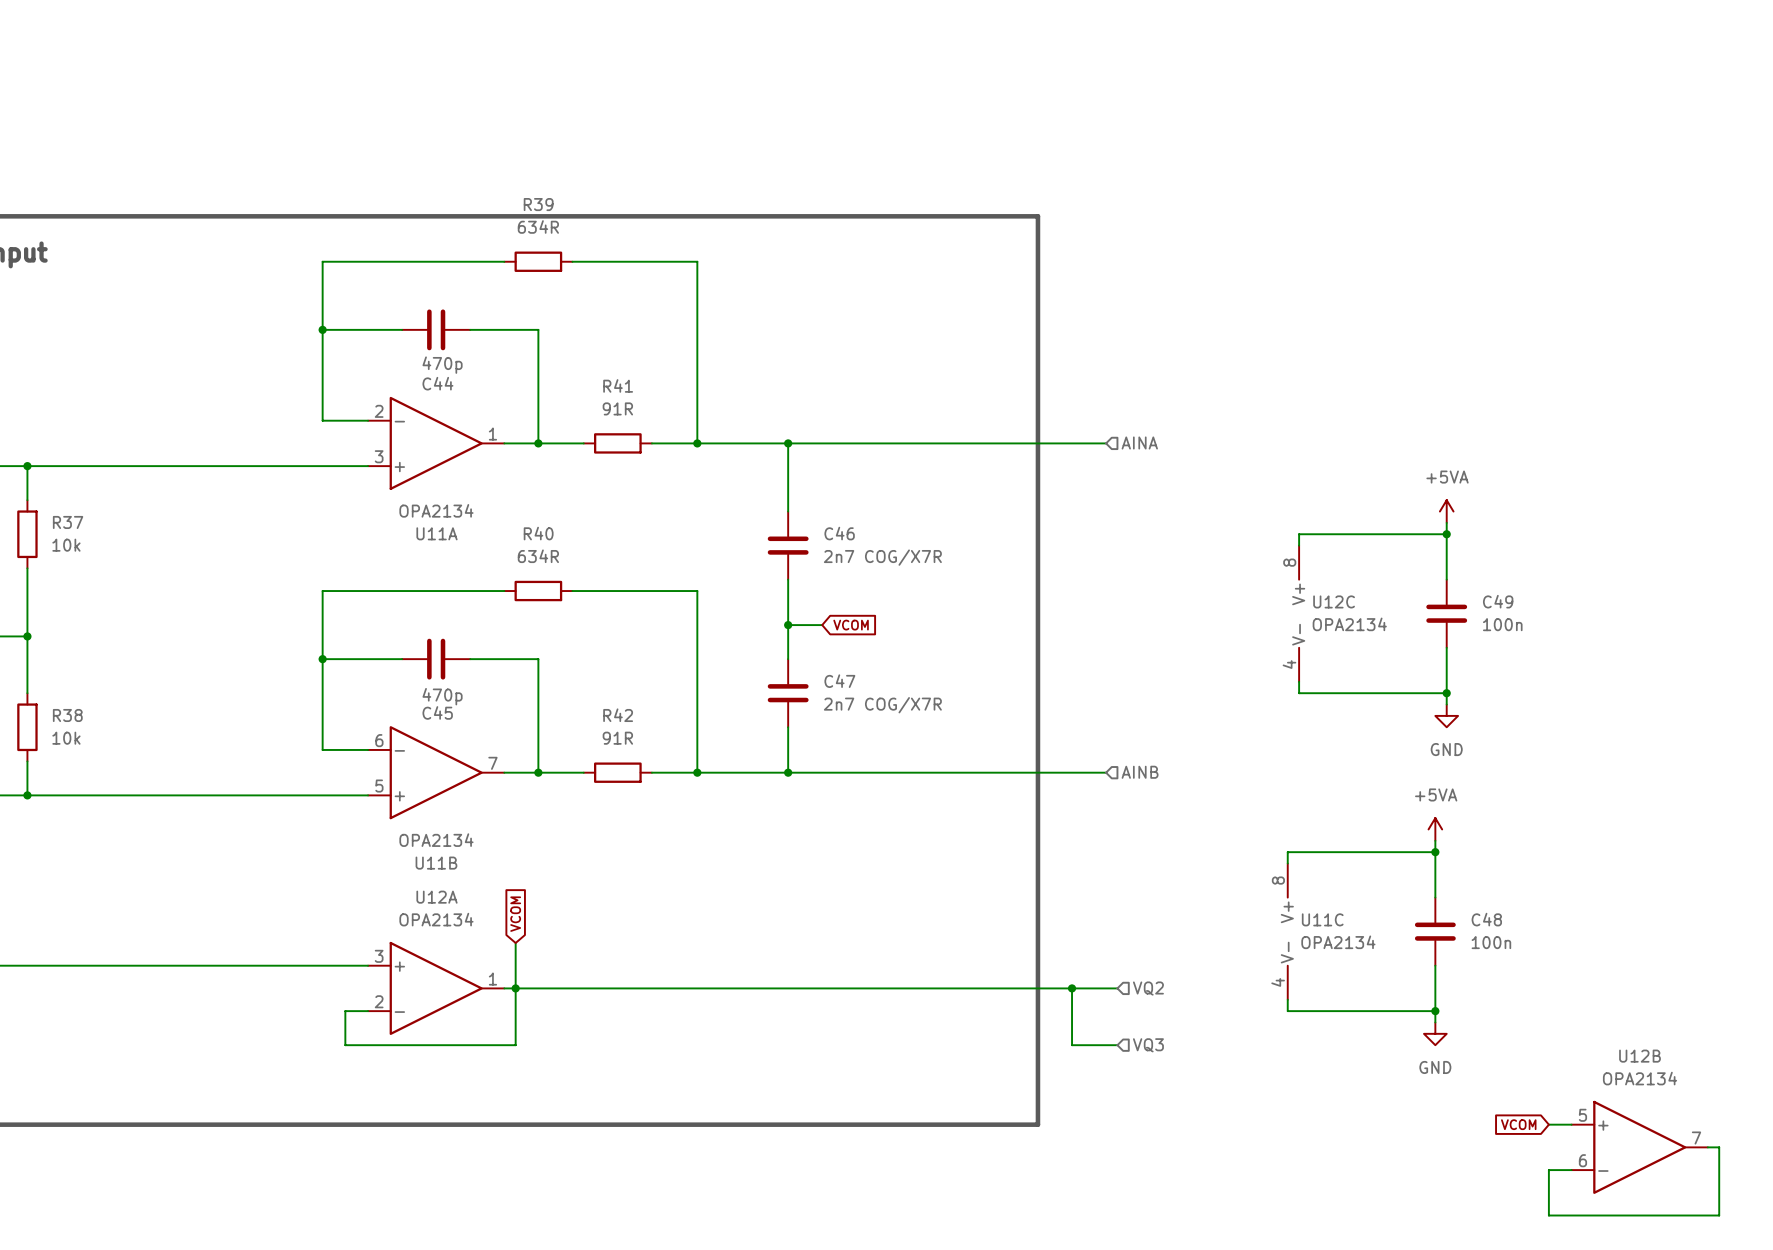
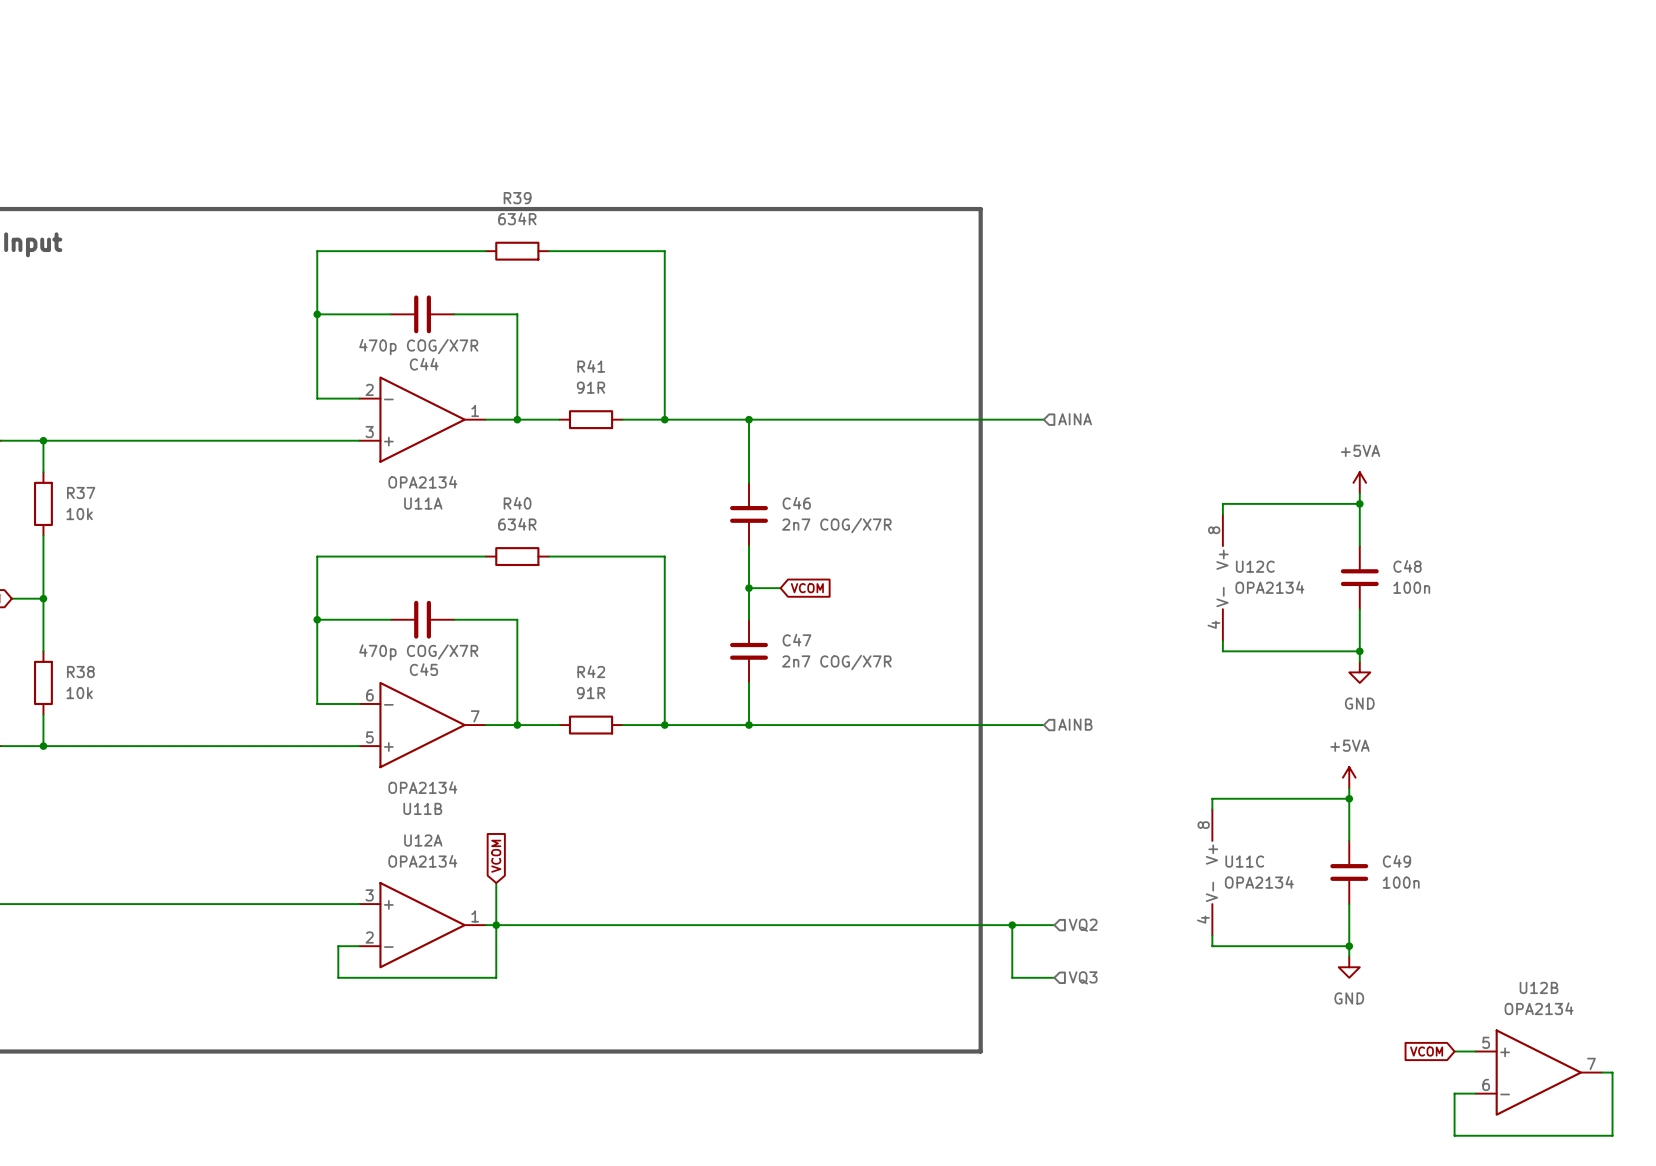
C44 value: 470p (442, 365) -> 470p COG/X7R (418, 347)
C49 name: C49 (1498, 601) -> C48 (1407, 566)
C45 value: 470p (442, 696) -> 470p COG/X7R (418, 652)
C48 name: C48 (1486, 919) -> C49 (1396, 861)

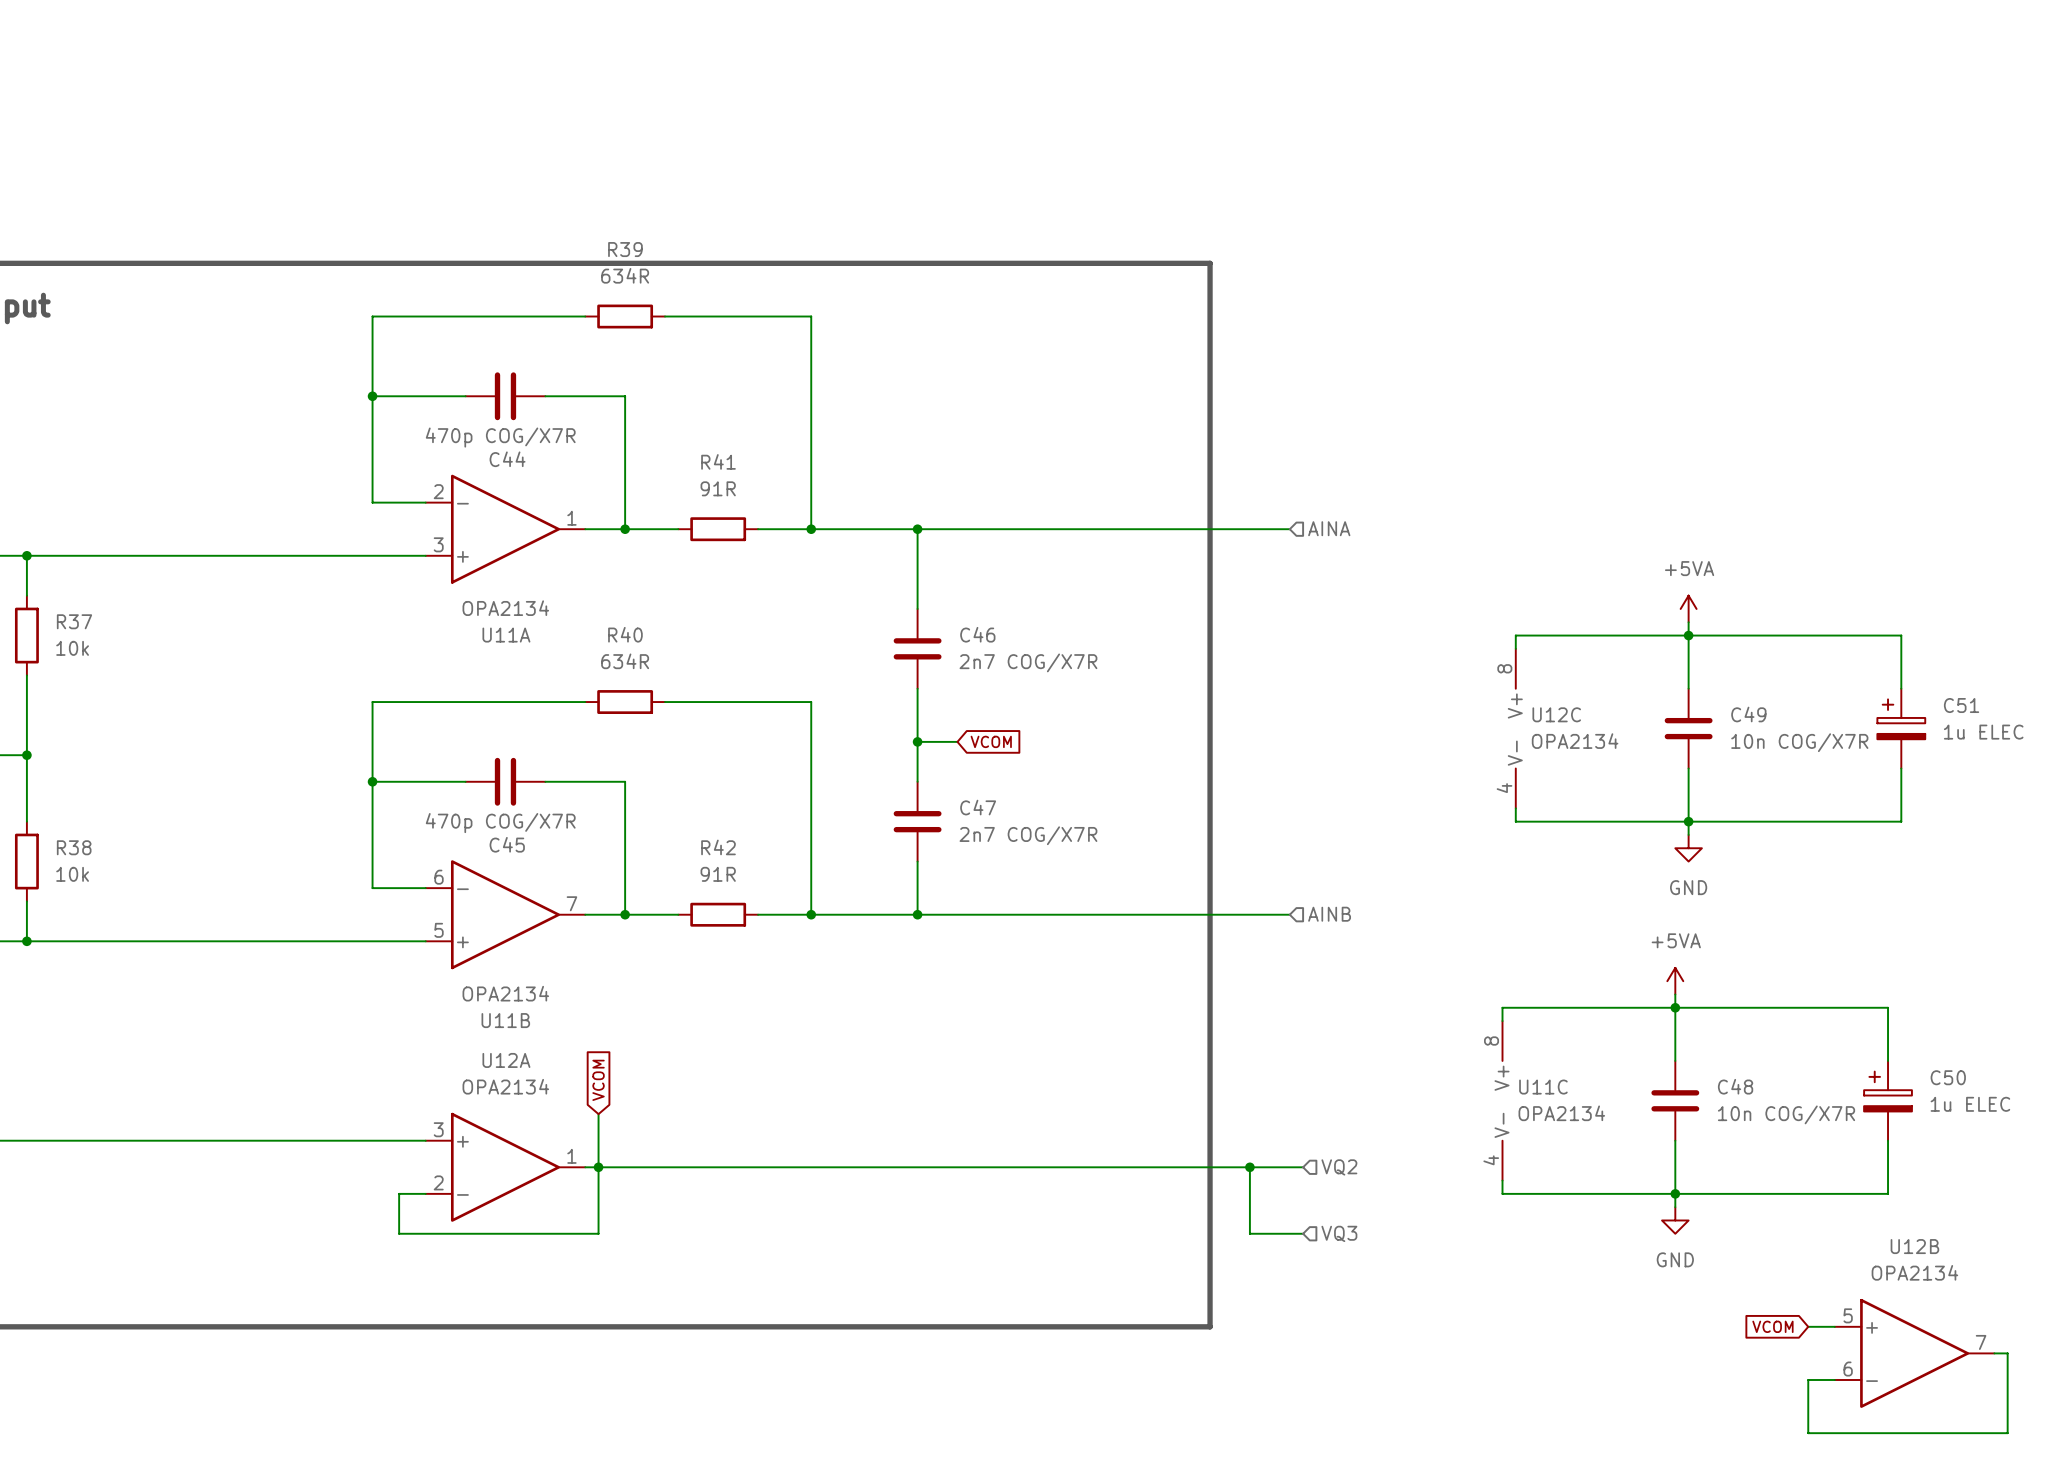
wire: none -> (1688, 635) (1901, 635) (1901, 688)
C48 name: C48 (1407, 566) -> C49 (1748, 714)
C51: none -> 1u ELEC (1901, 728)
C48 value: 100n (1411, 587) -> 10n COG/X7R (1799, 742)
wire: none -> (1901, 768) (1901, 821) (1688, 821)
wire: none -> (1675, 1007) (1888, 1007) (1888, 1060)
C49 name: C49 (1396, 861) -> C48 (1735, 1086)
C50: none -> 1u ELEC (1888, 1100)
C49 value: 100n (1401, 882) -> 10n COG/X7R (1786, 1114)
wire: none -> (1888, 1140) (1888, 1193) (1675, 1193)

